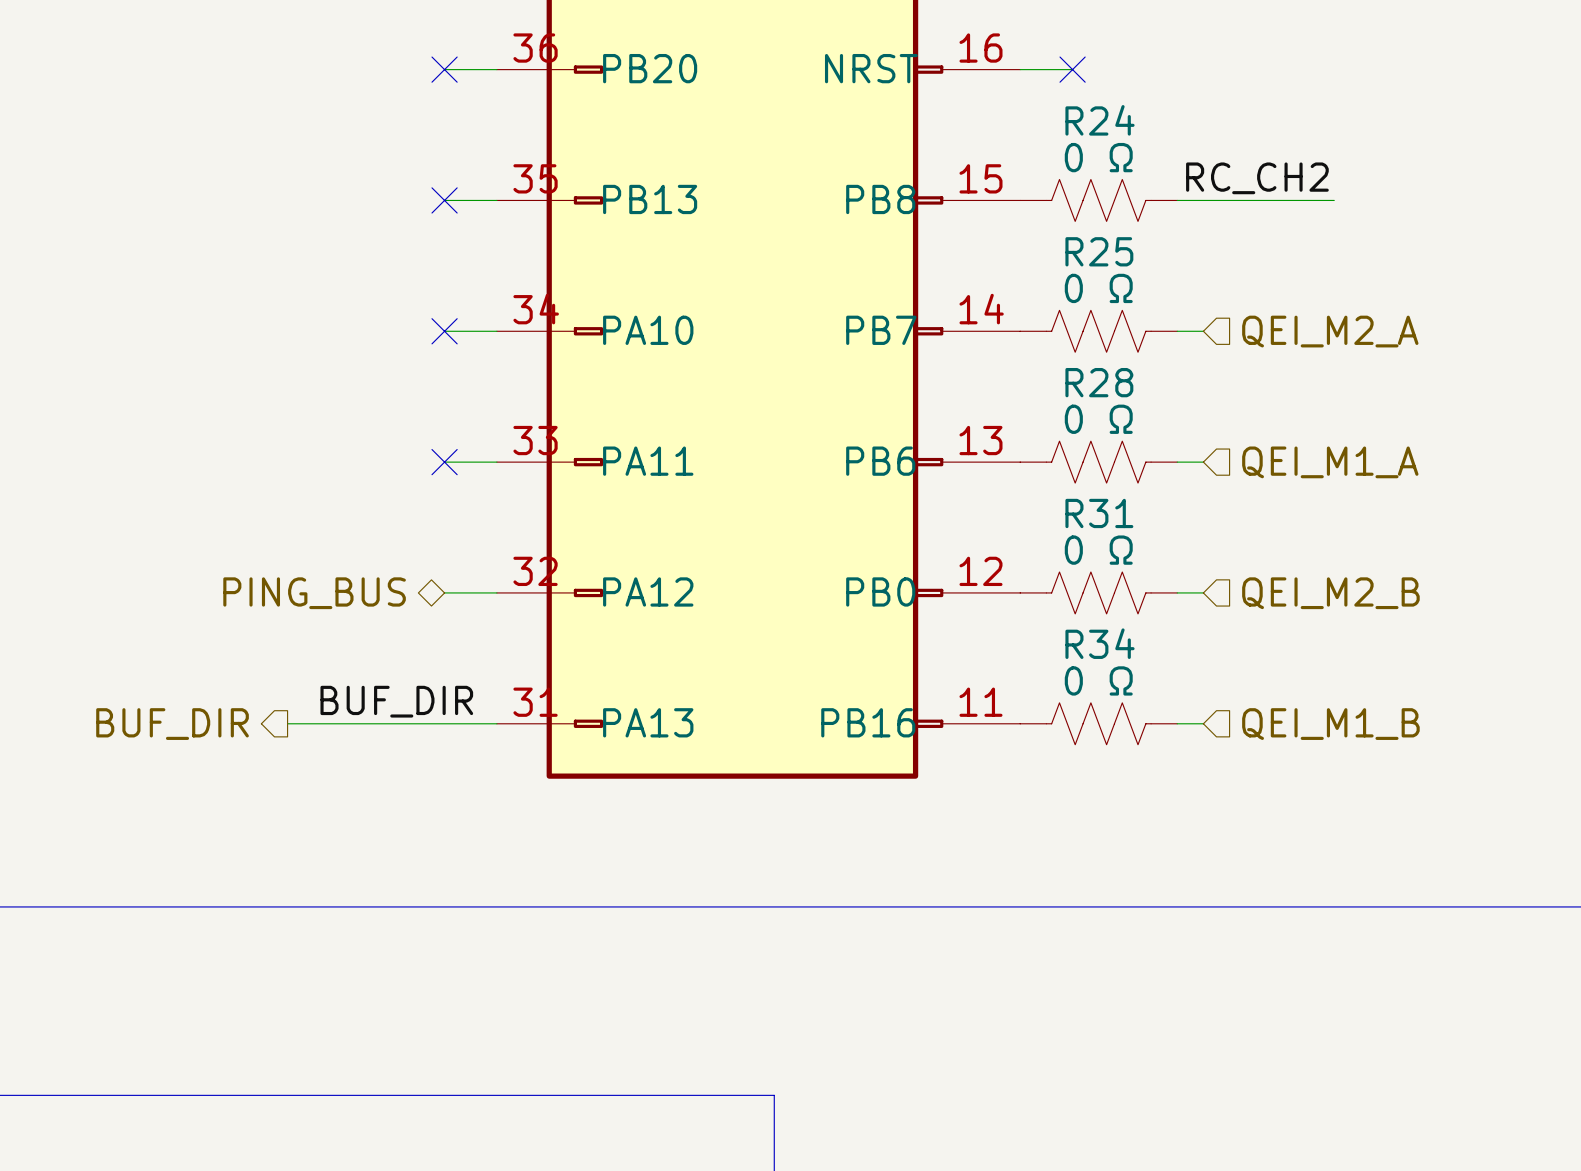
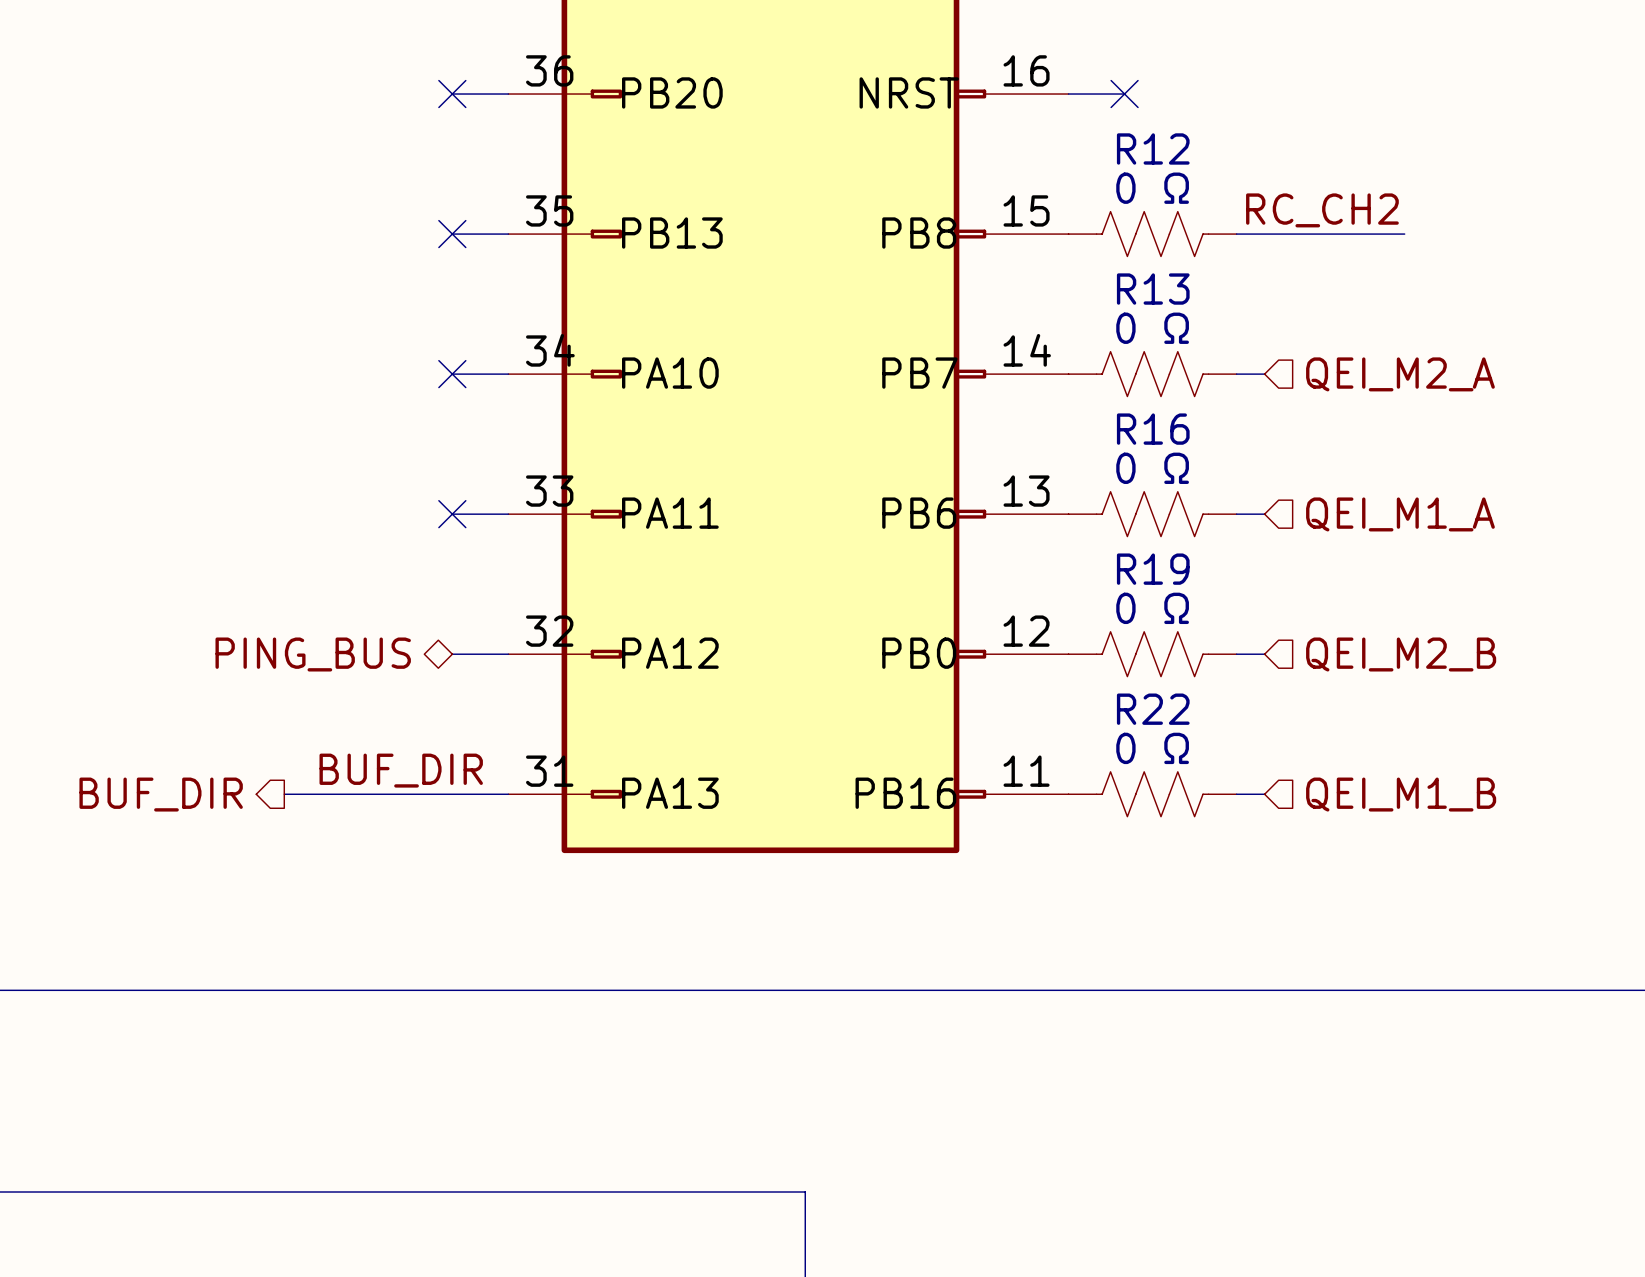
R24 name: R24 (1099, 120) -> R12 (1153, 148)
R25 name: R25 (1099, 251) -> R13 (1153, 289)
R28 name: R28 (1099, 382) -> R16 (1153, 429)
R31 name: R31 (1099, 513) -> R19 (1153, 569)
R34 name: R34 (1099, 643) -> R22 (1153, 709)

